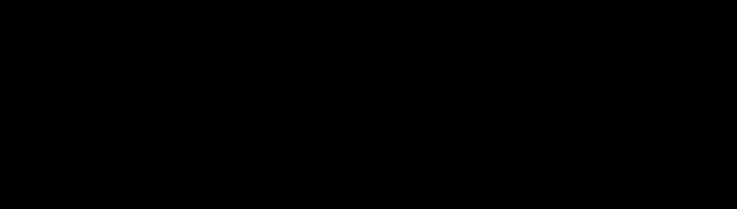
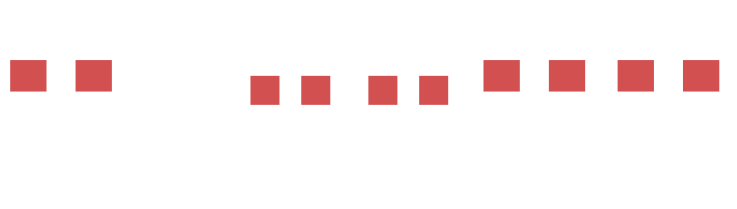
part: none -> (61, 75)
part: none -> (534, 75)
part: none -> (668, 75)
part: none -> (290, 90)
part: none -> (408, 90)

